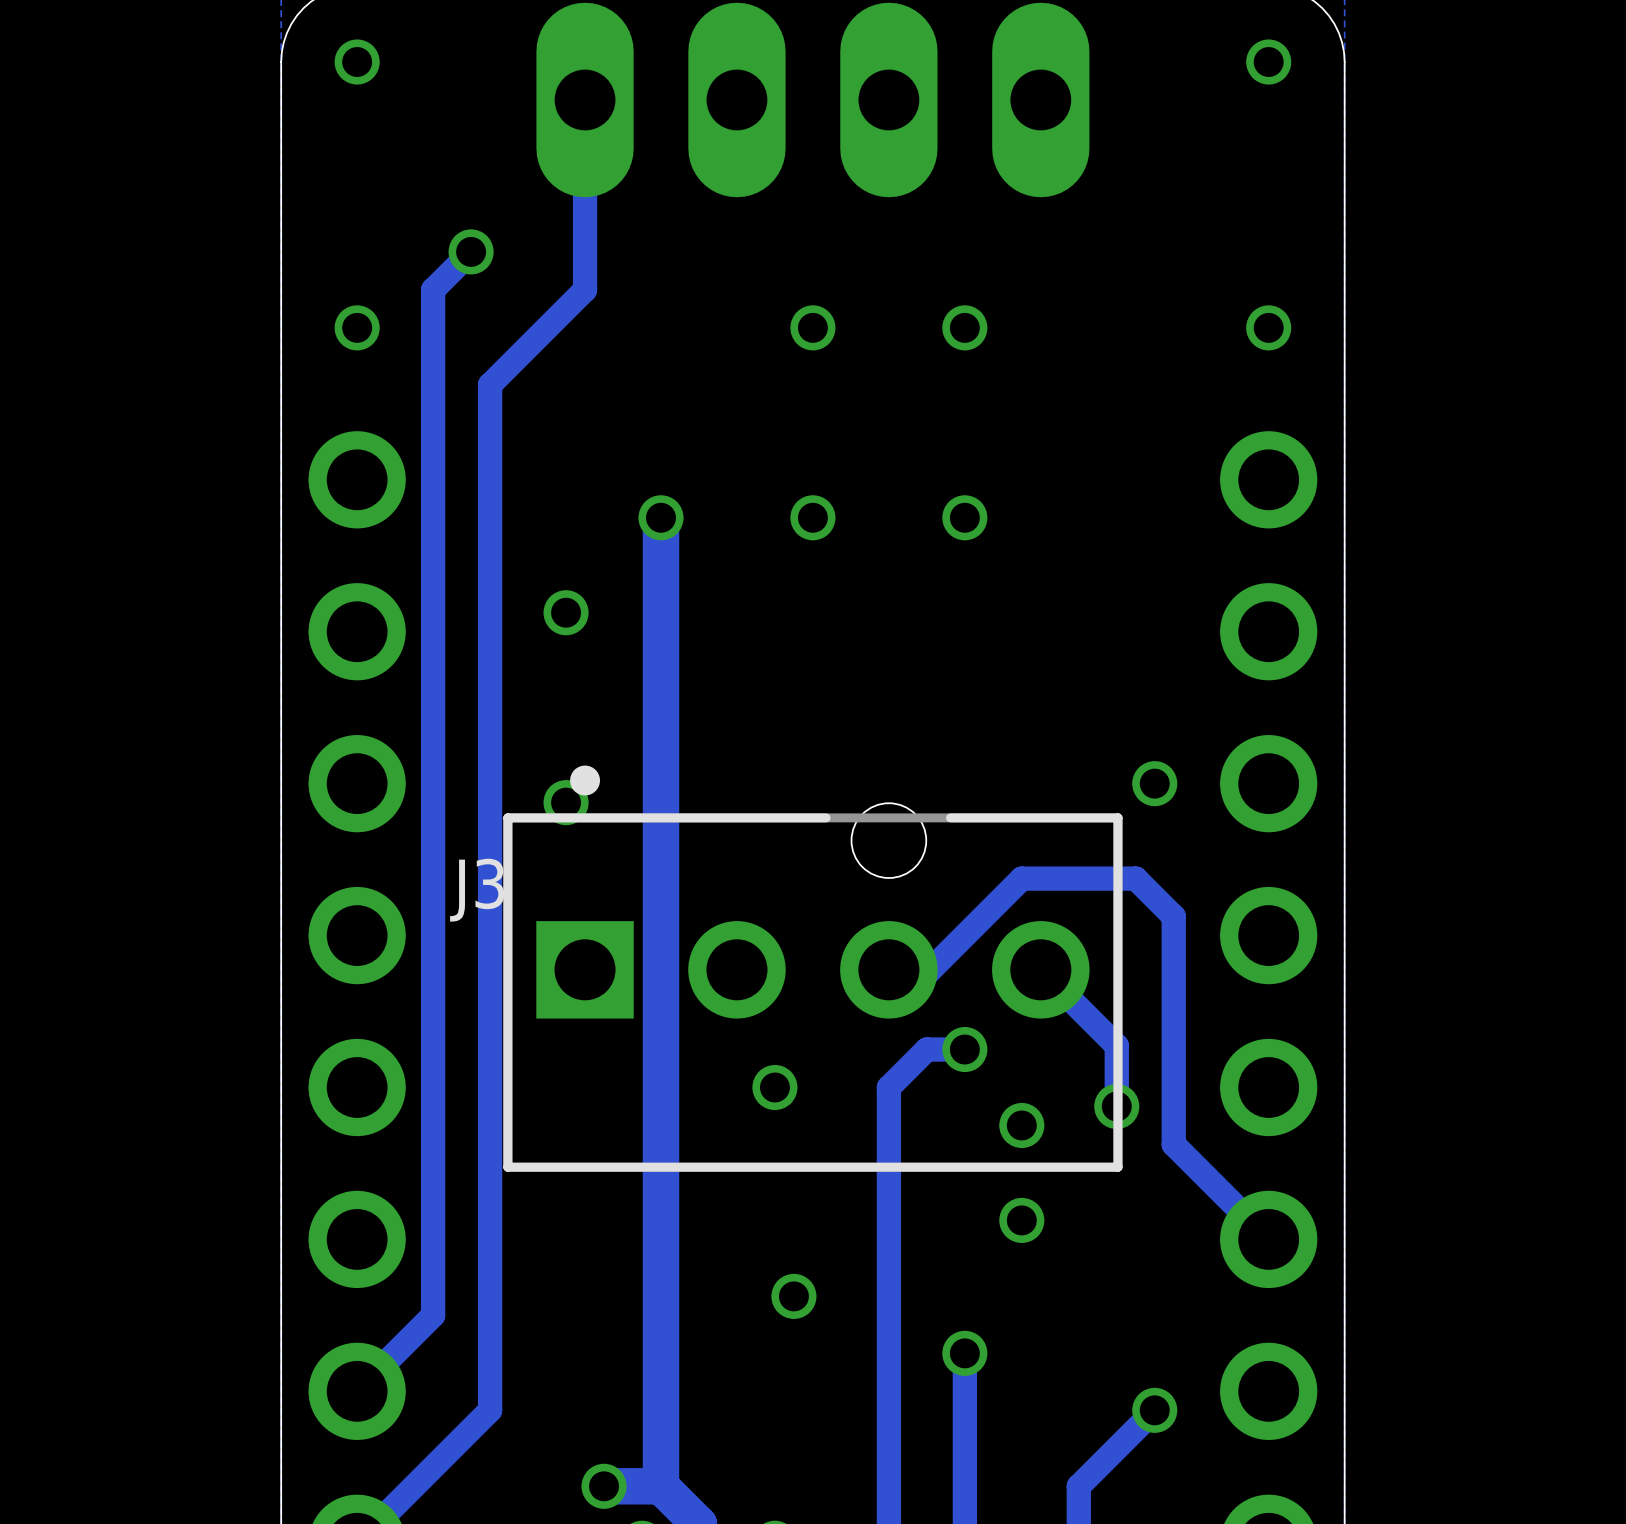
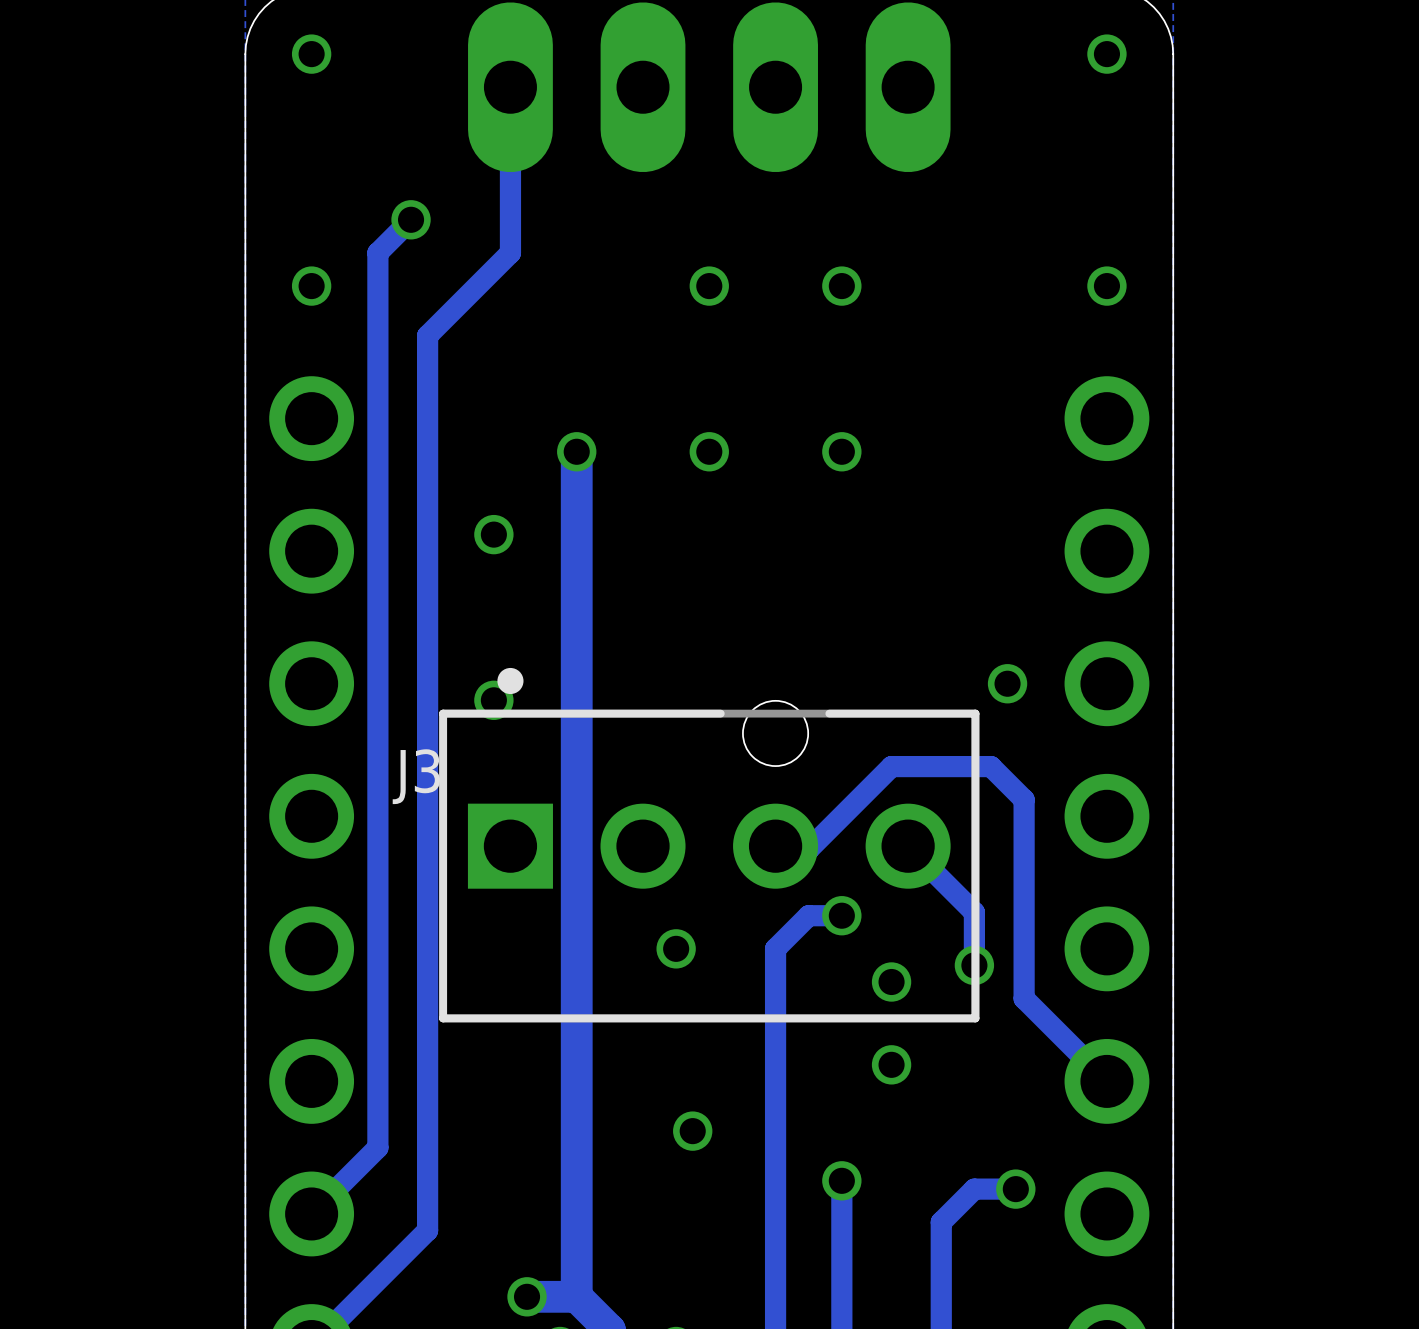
track: (1154, 1410) (1078, 1486) -> (1015, 1189) (974, 1189) (941, 1222) (941, 1296)
via position: (1154, 1410) -> (1015, 1189)

